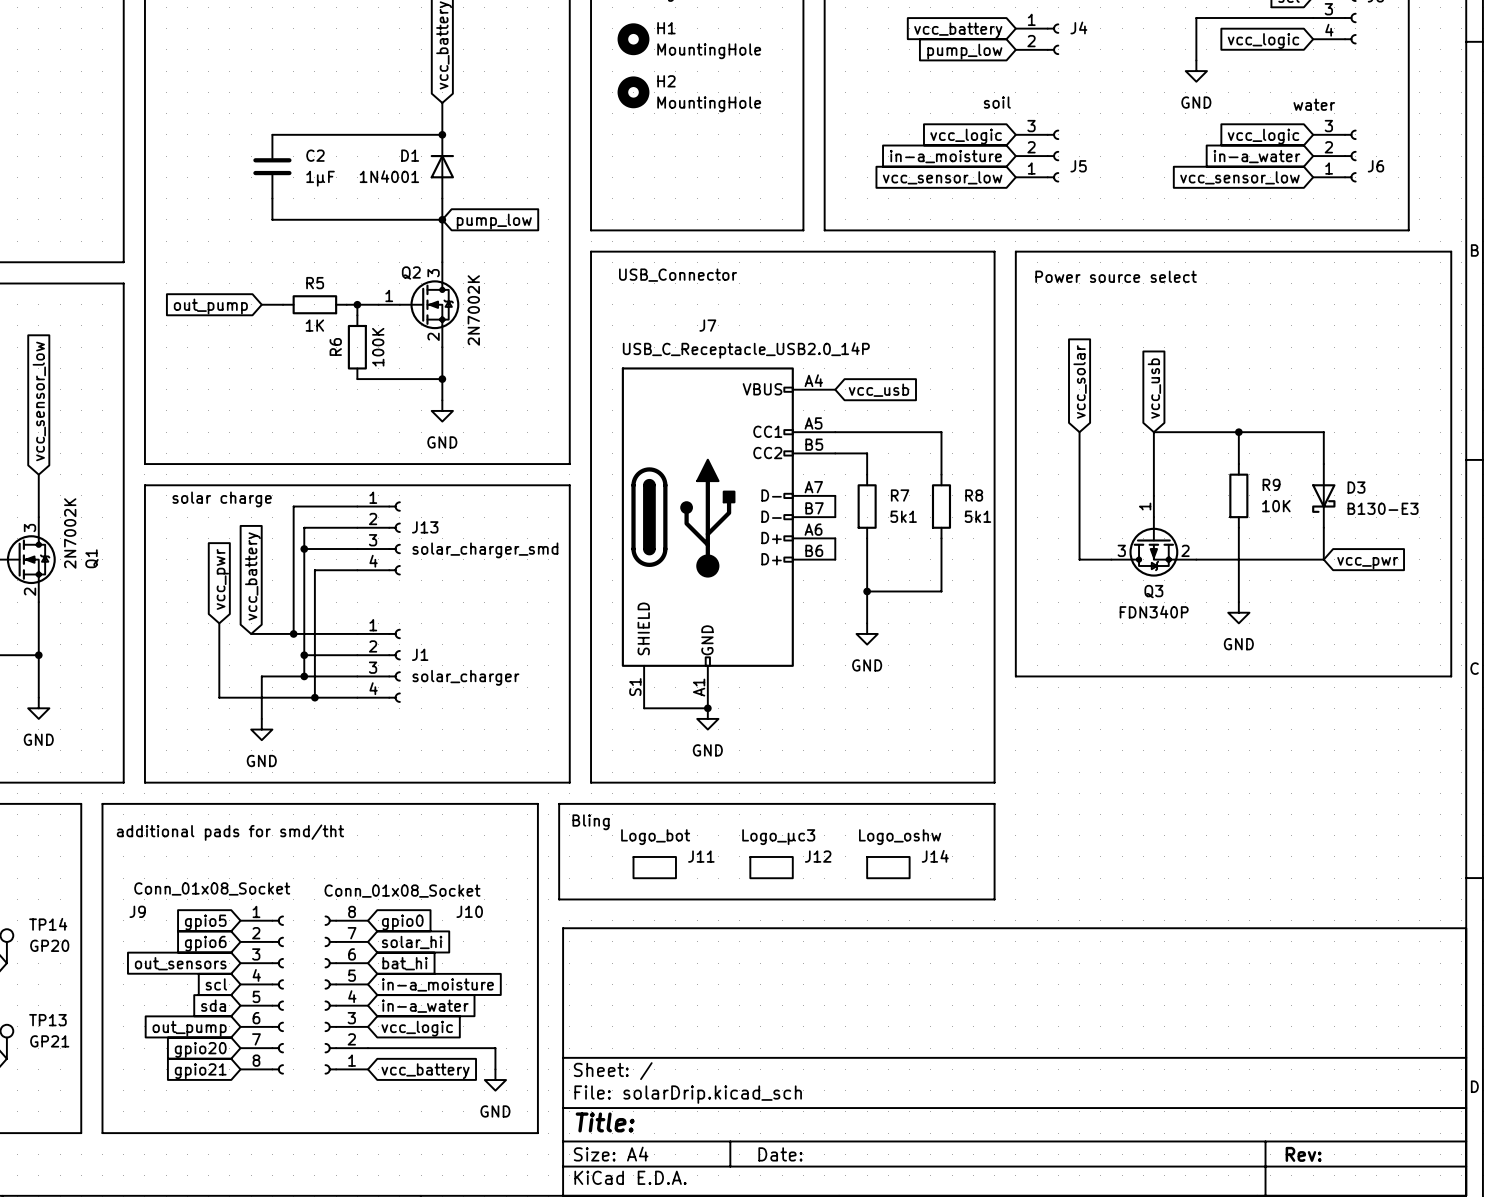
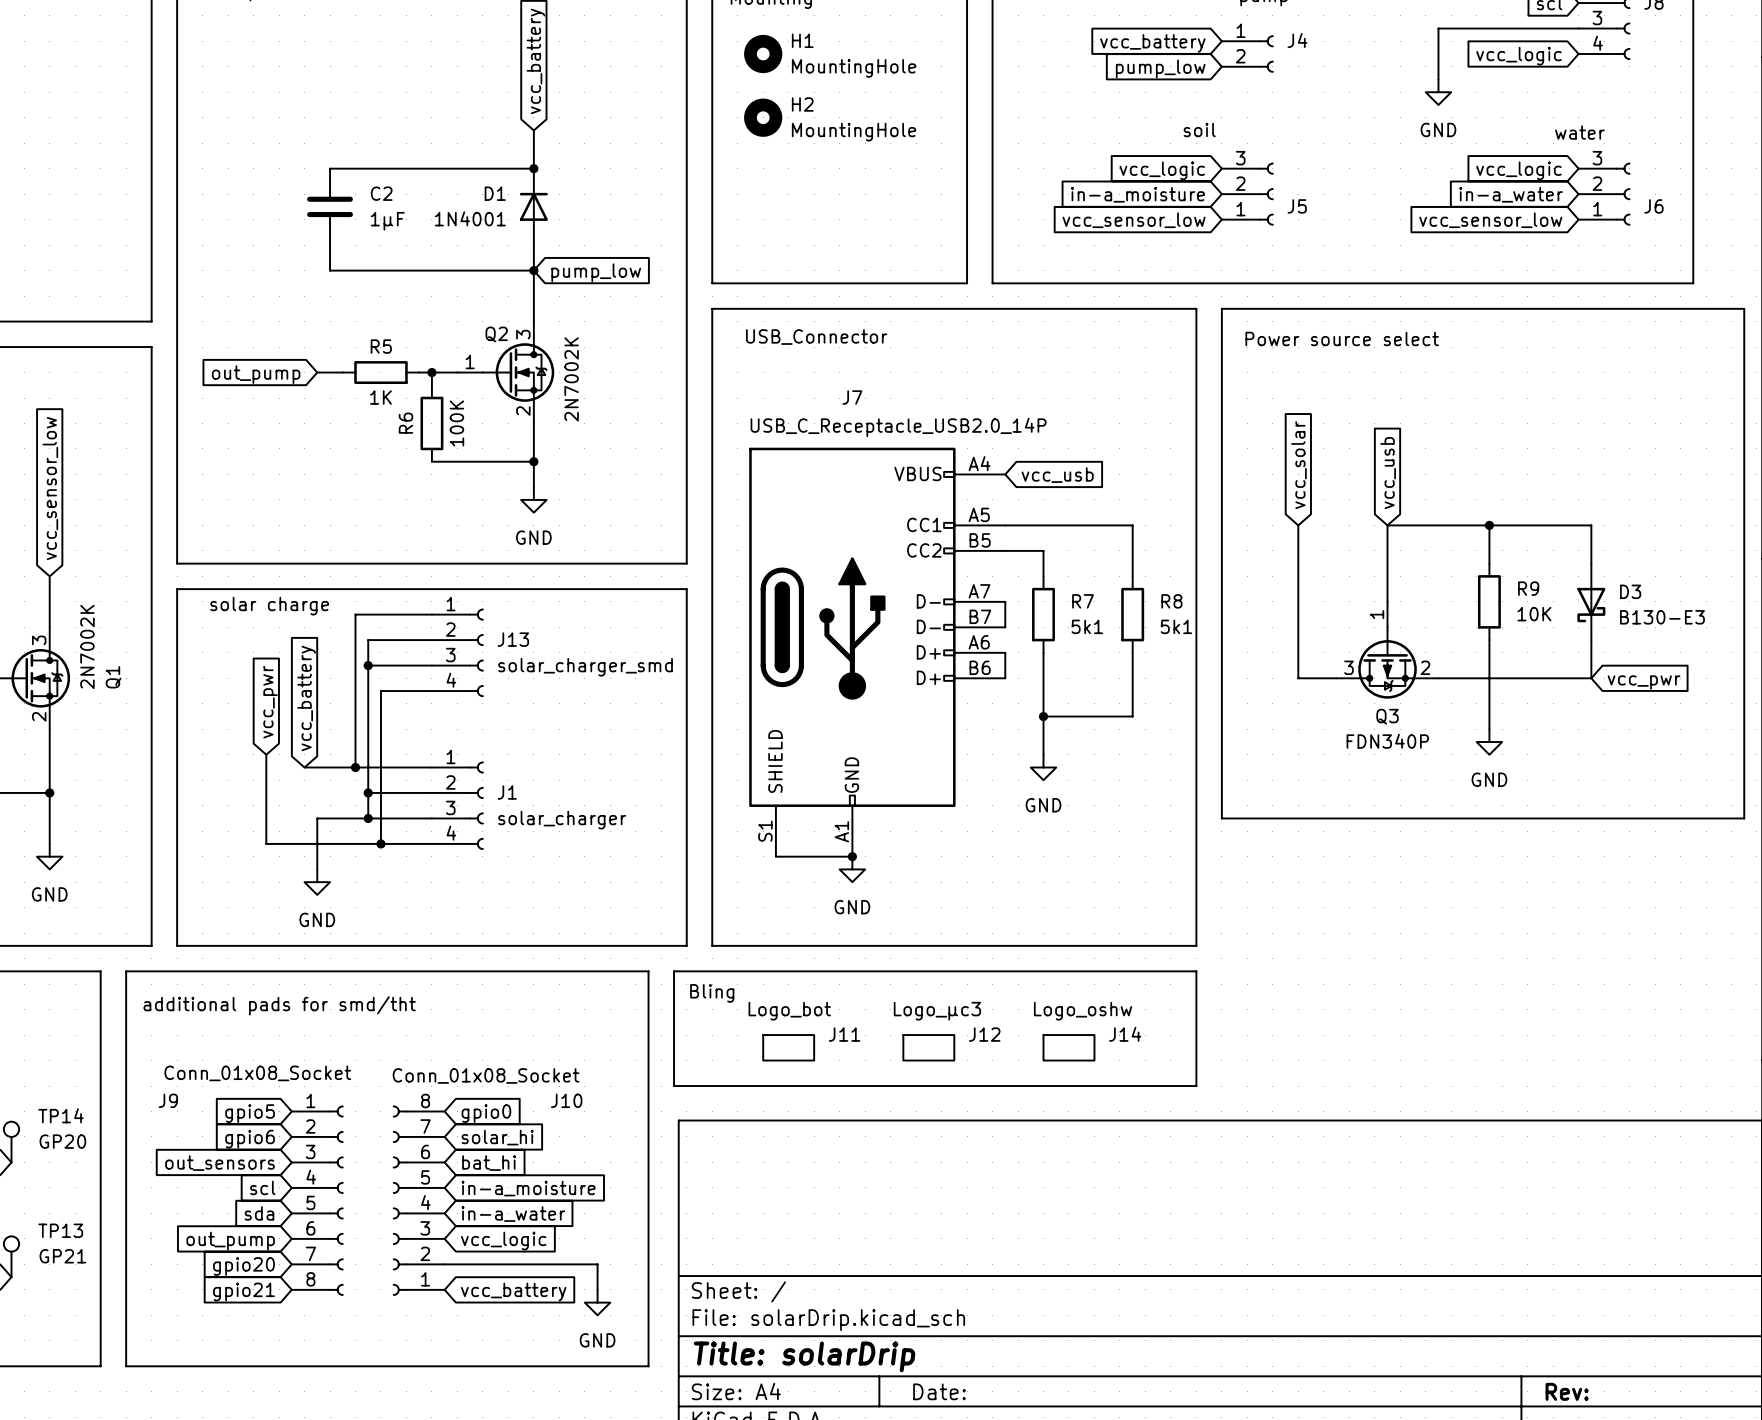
title block: Title: (605, 1122) -> Title: solarDrip (804, 1356)

